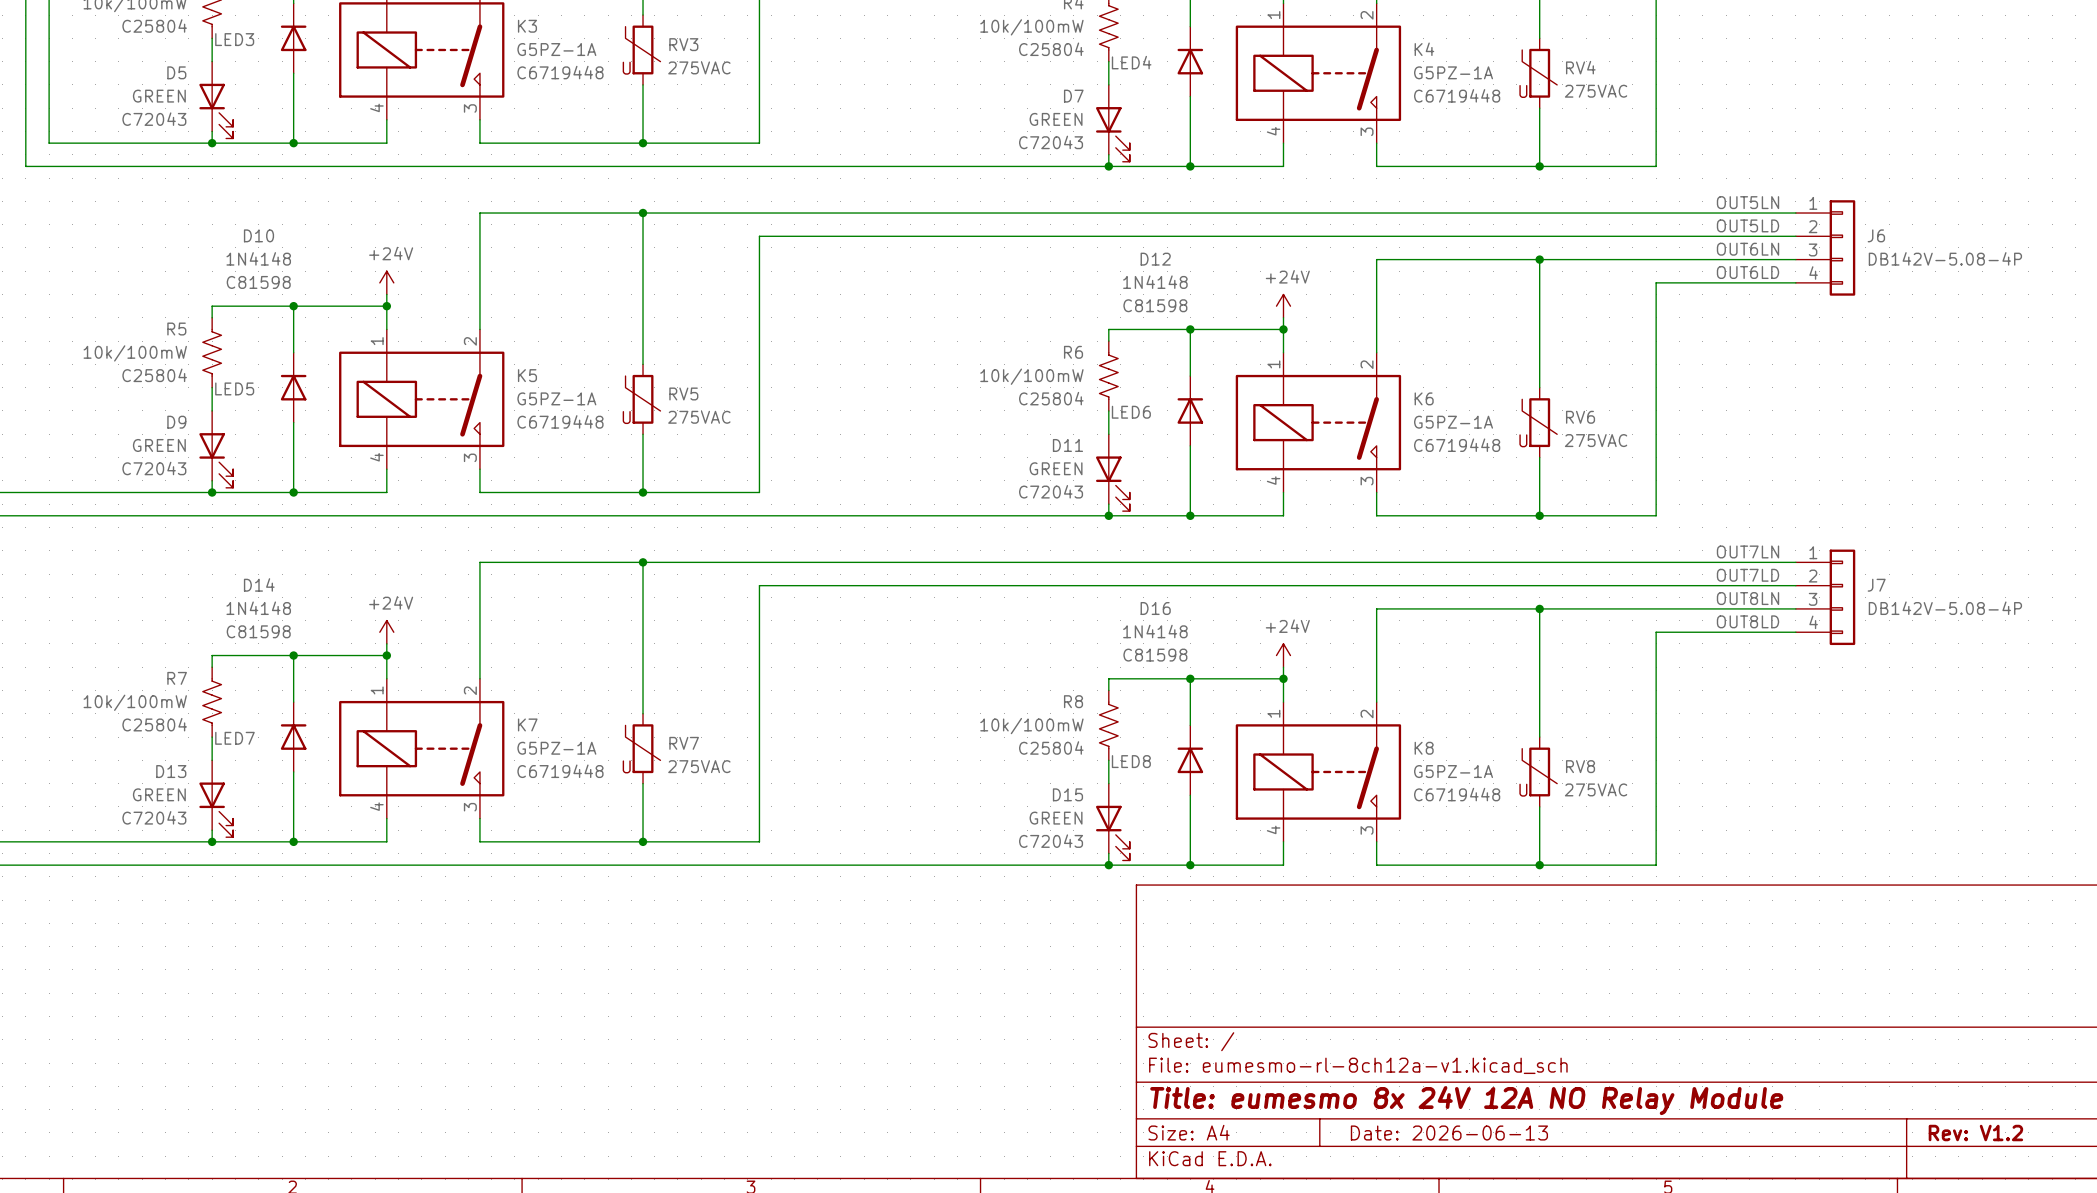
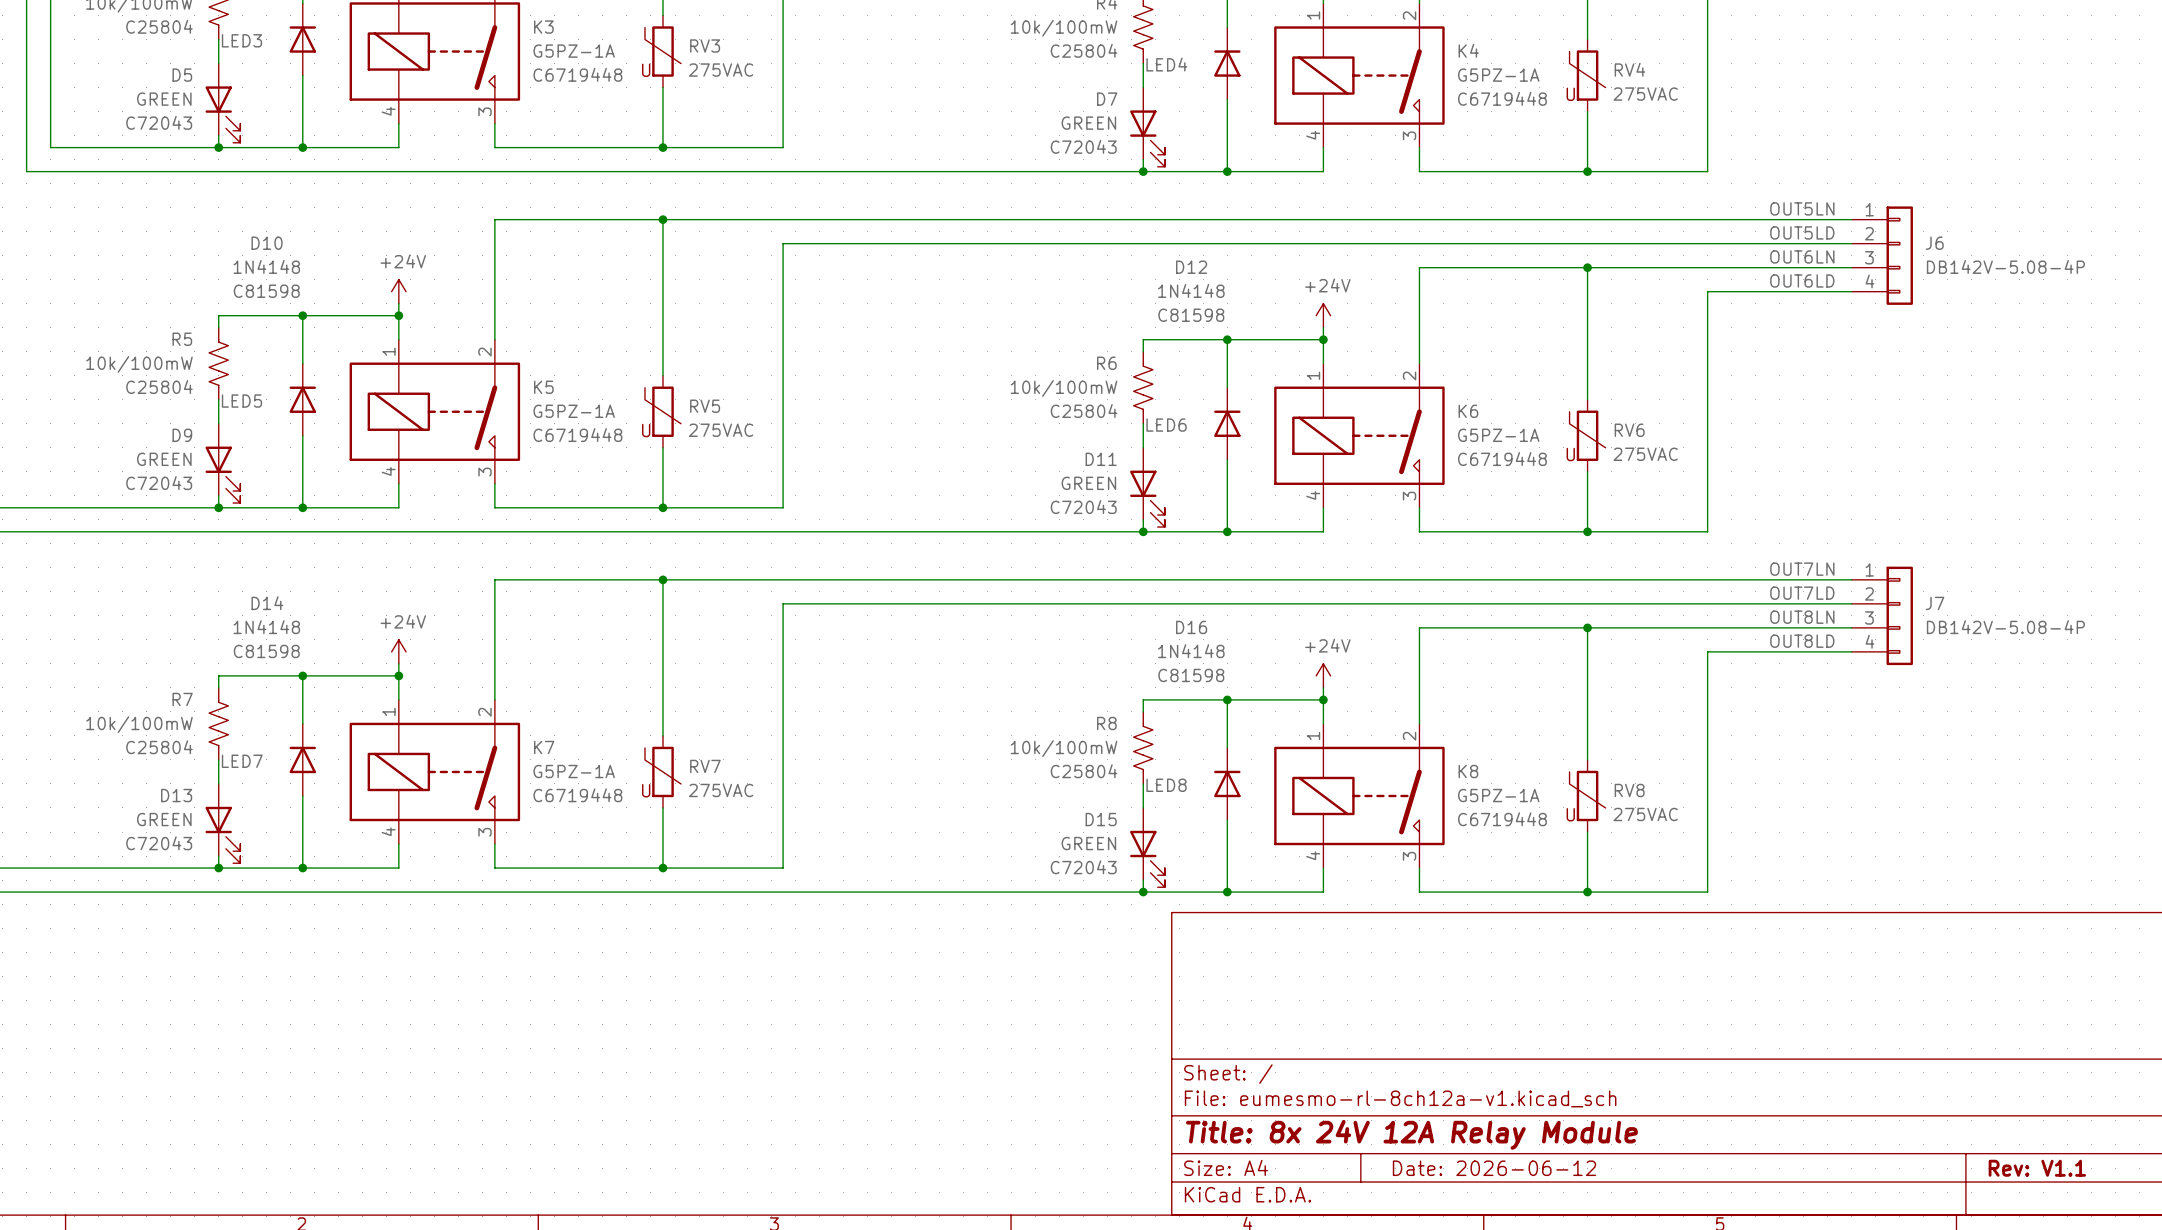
title block: Title: eumesmo 8x 24V 12A NO Relay Module (1466, 1100) -> Title: 8x 24V 12A Relay Module (1411, 1134)
title block: Date: 2026-06-13 (1449, 1133) -> Date: 2026-06-12 (1494, 1168)
title block: Rev: V1.2 (1975, 1133) -> Rev: V1.1 (2037, 1168)

